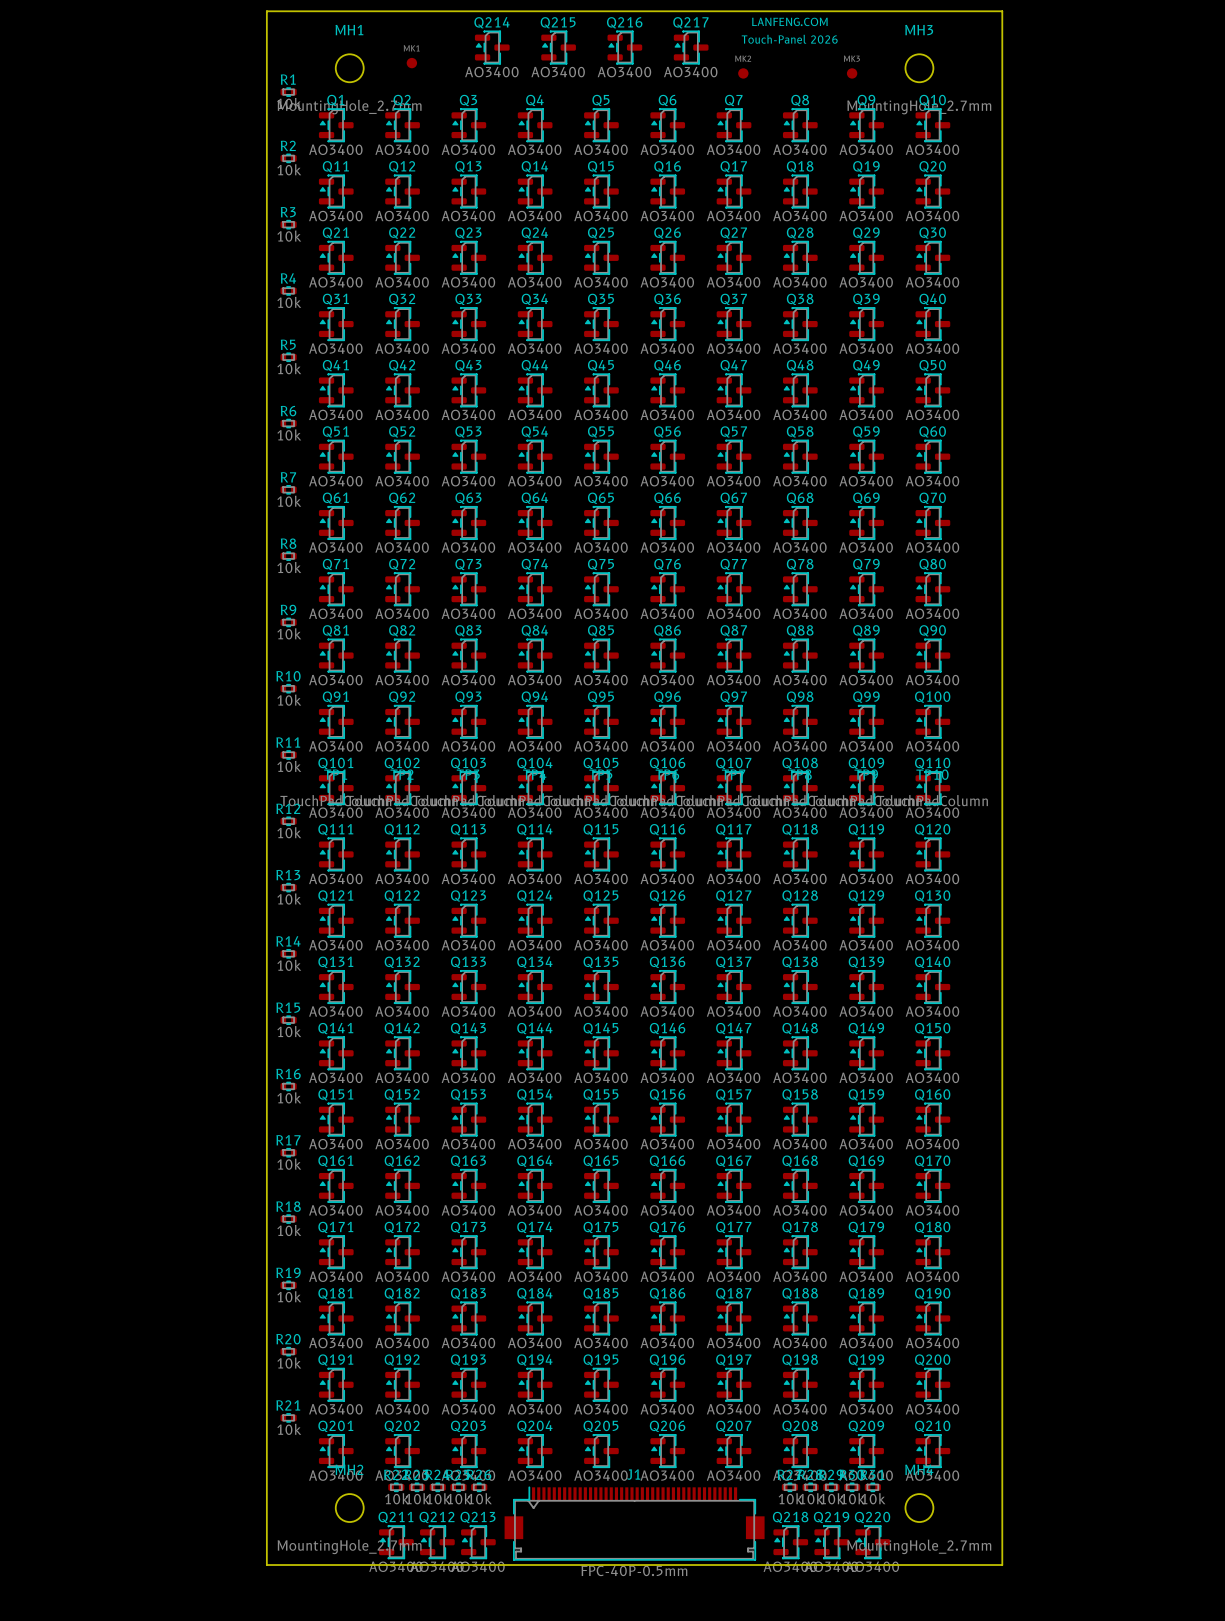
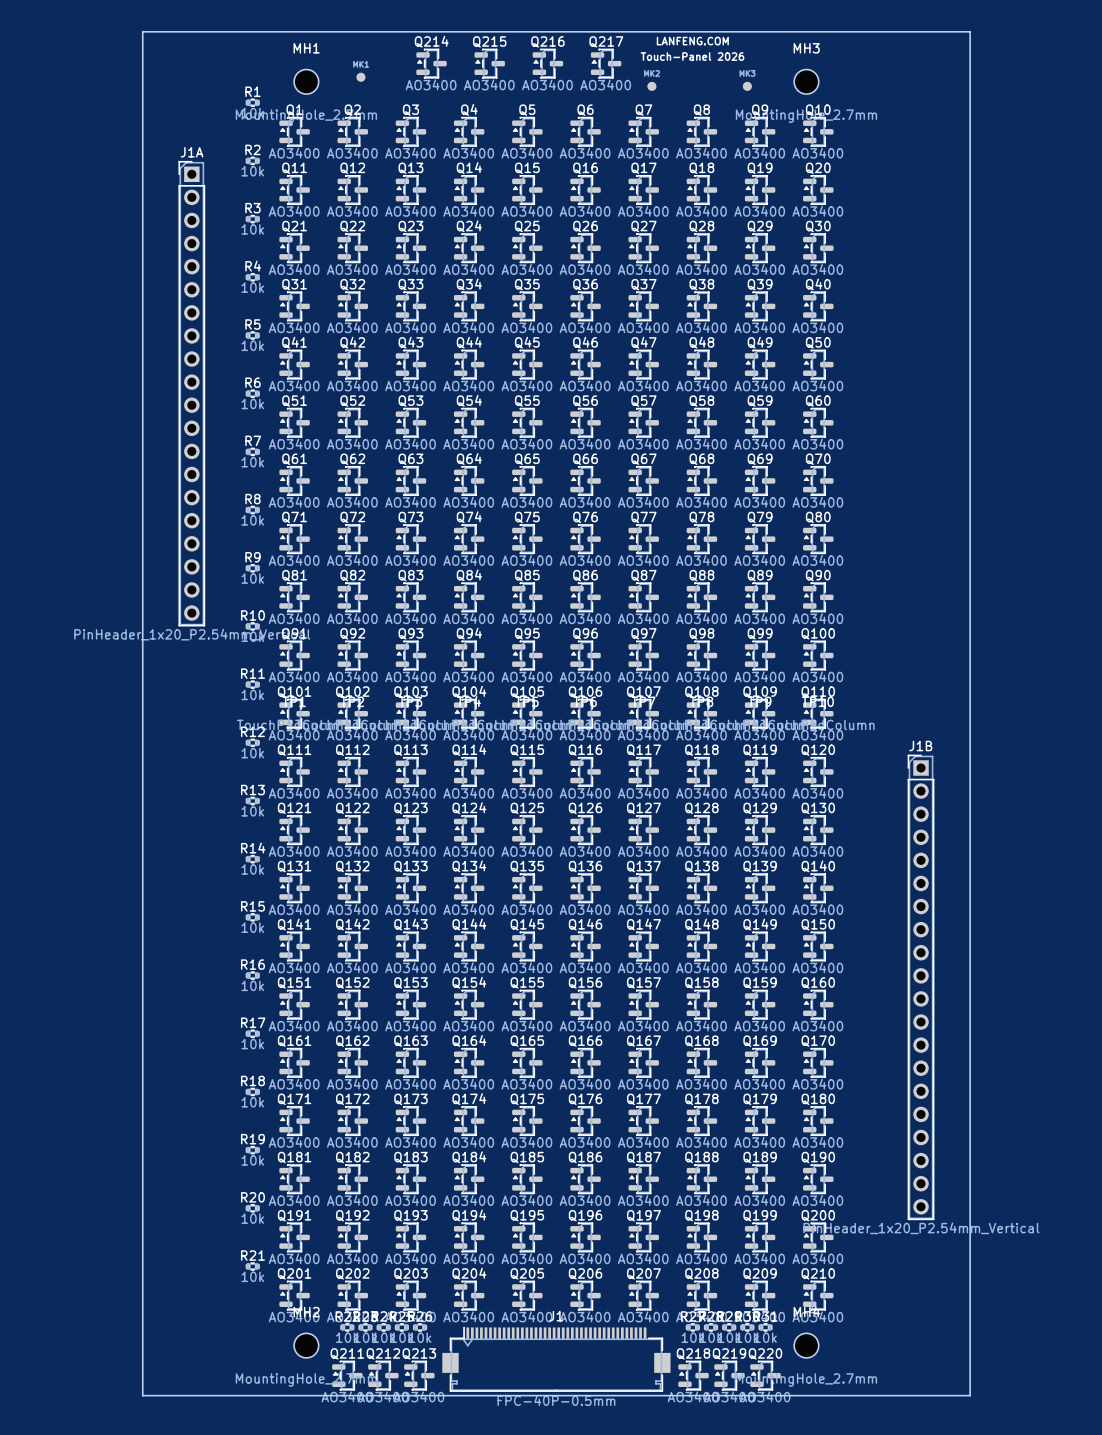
board edge: (266, 11) (266, 1565) -> (233, 31) (142, 31) (142, 1395) (233, 1395)
board edge: (1002, 11) (1002, 1565) -> (879, 31) (970, 31) (970, 1395) (879, 1395)
J1A: none -> PinHeader_1x20_P2.54mm_Vertical (191, 393)
J1B: none -> PinHeader_1x20_P2.54mm_Vertical (921, 987)

